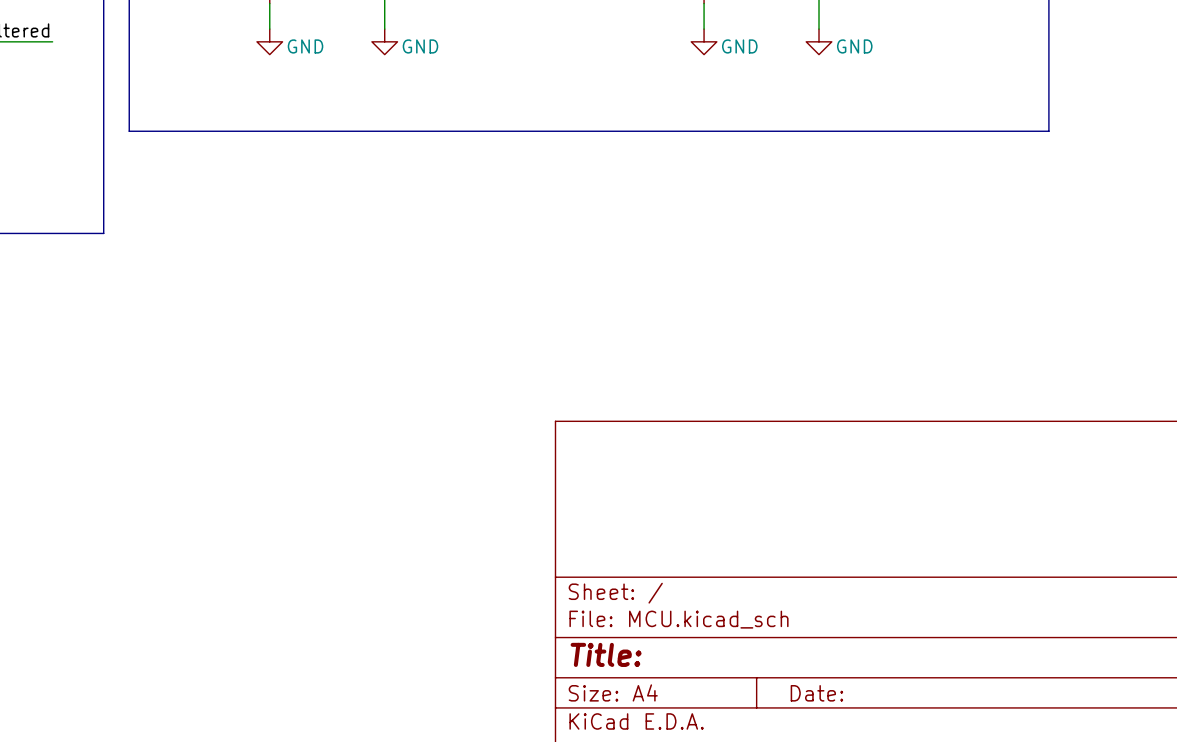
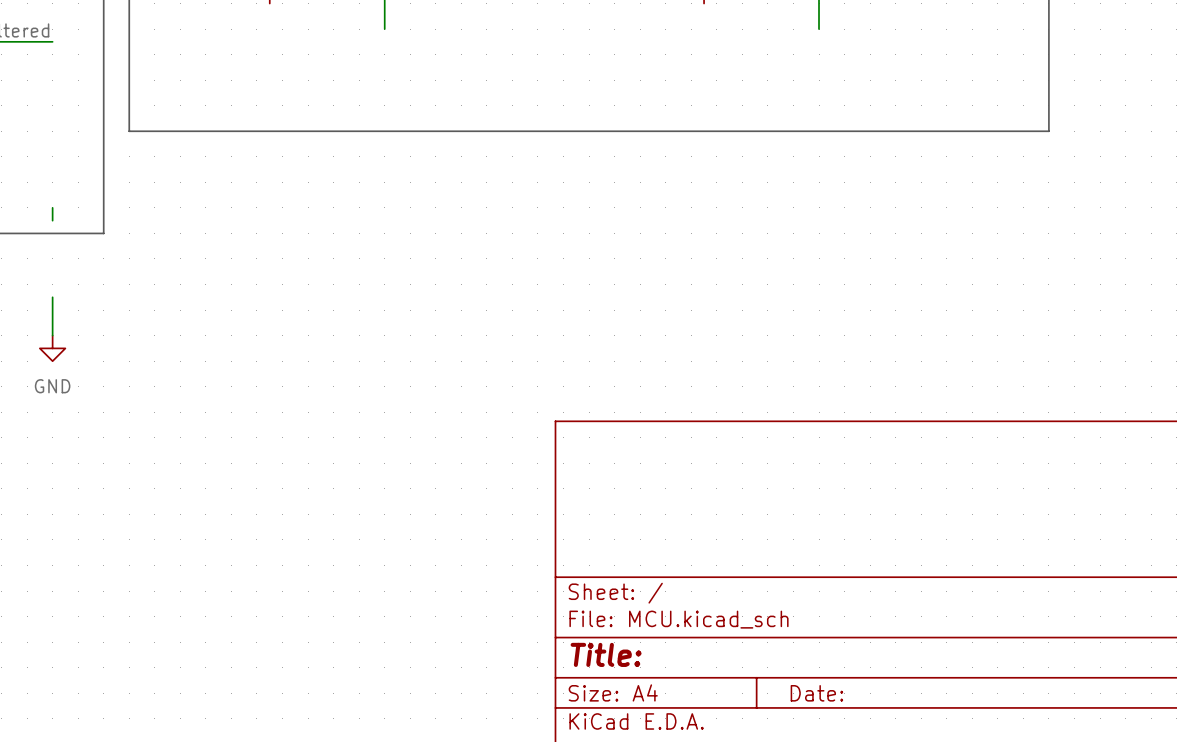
wire: (269, 3) (269, 29) -> none
wire: (704, 3) (704, 29) -> none
power symbol: GND (269, 41) -> none
power symbol: GND (384, 41) -> none
power symbol: GND (704, 41) -> none
power symbol: GND (819, 41) -> none
wire: none -> (52, 207) (52, 220)
wire: none -> (52, 297) (52, 335)
power symbol: none -> GND (52, 348)

